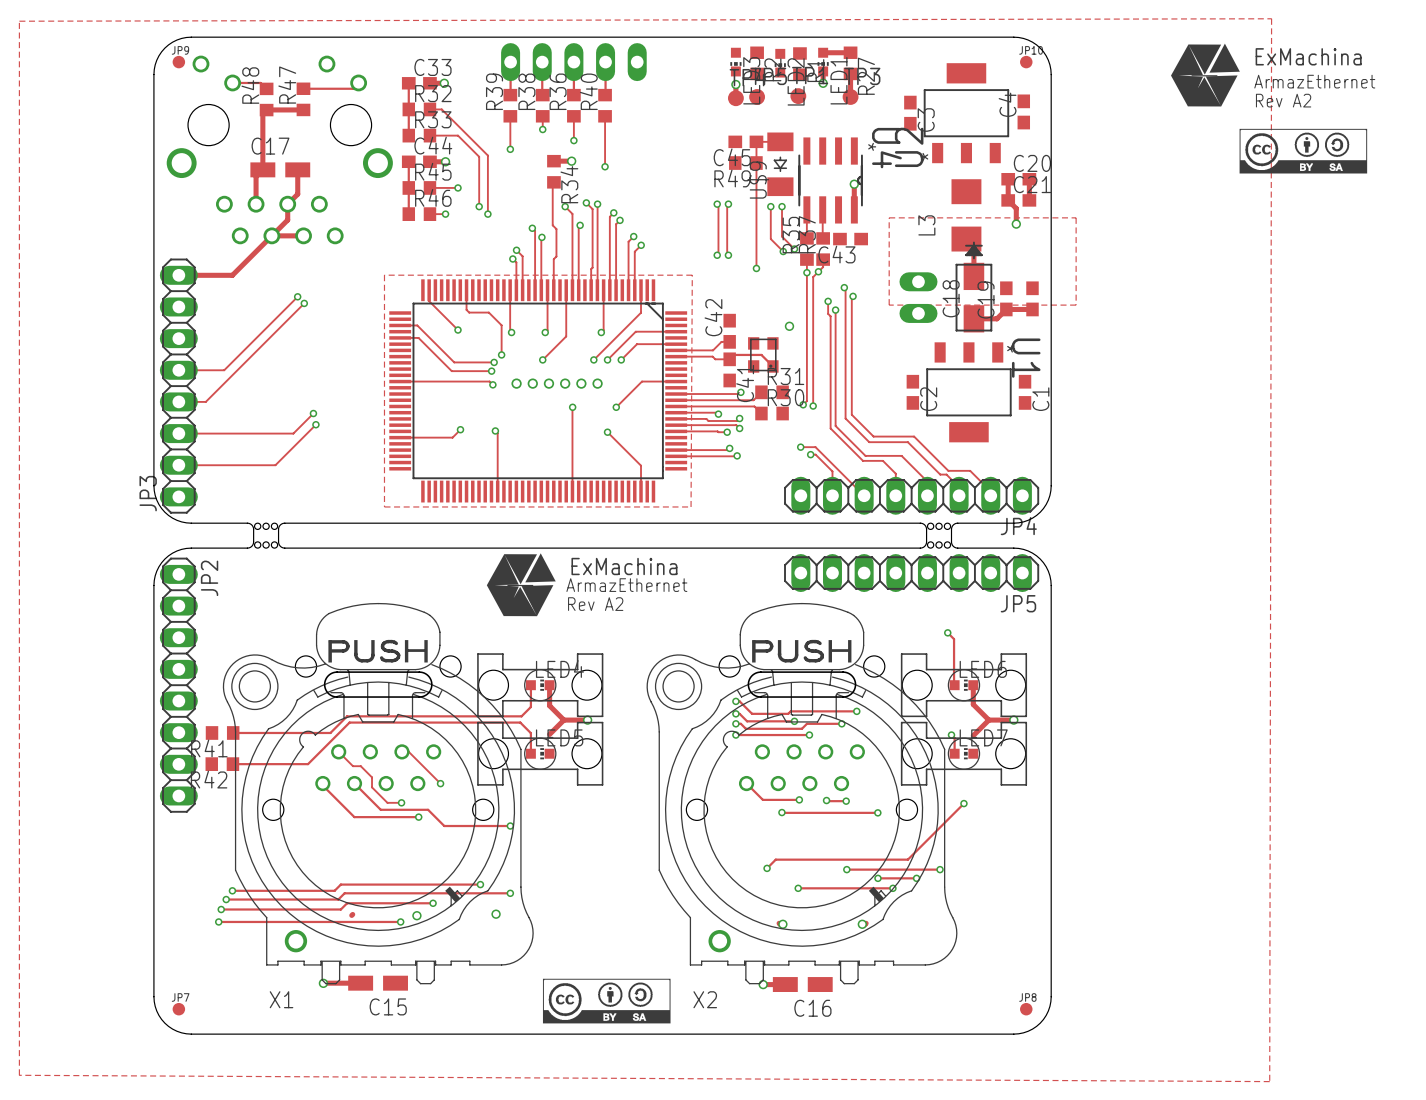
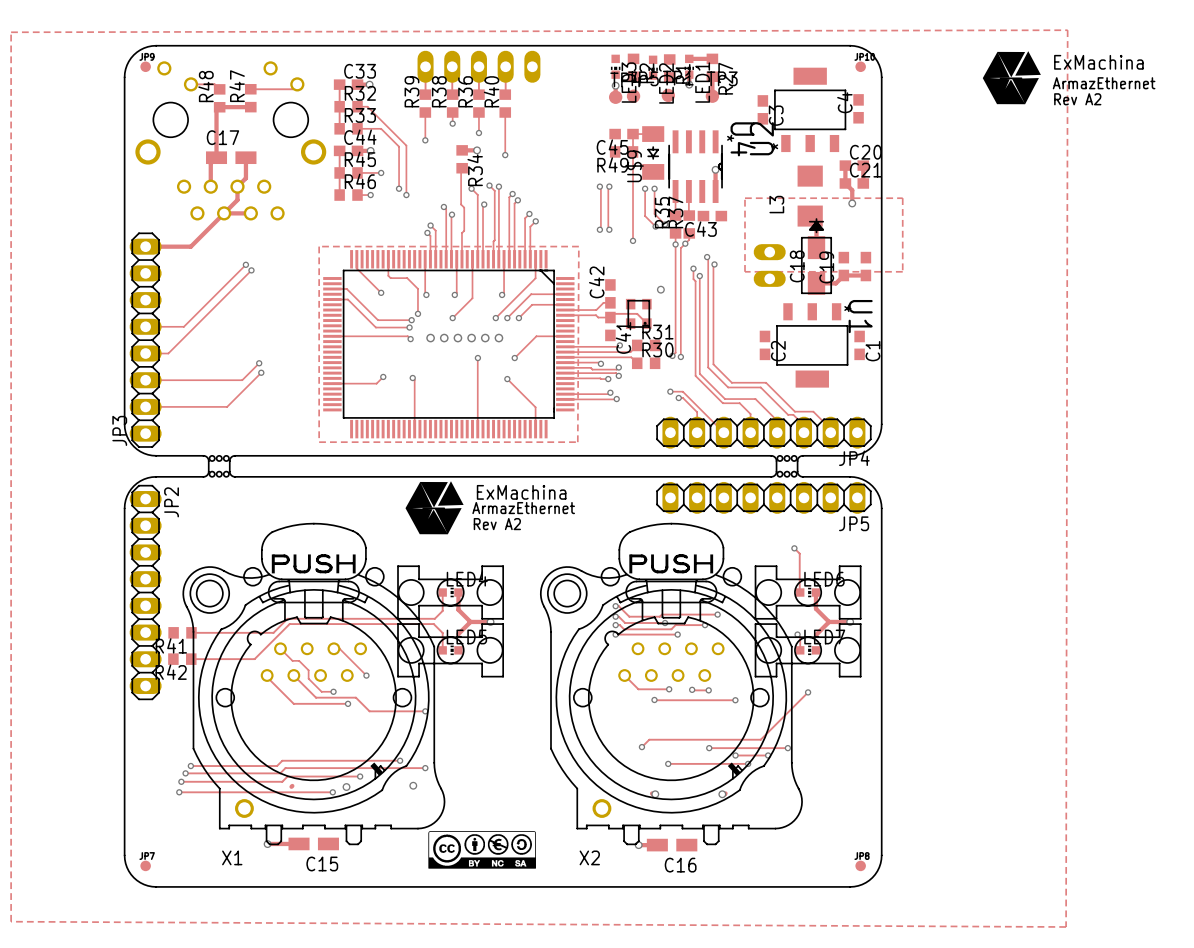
drawing: [1239, 128, 1368, 174] -> none
drawing: none -> [428, 831, 536, 869]
drawing: [542, 978, 671, 1024] -> none

